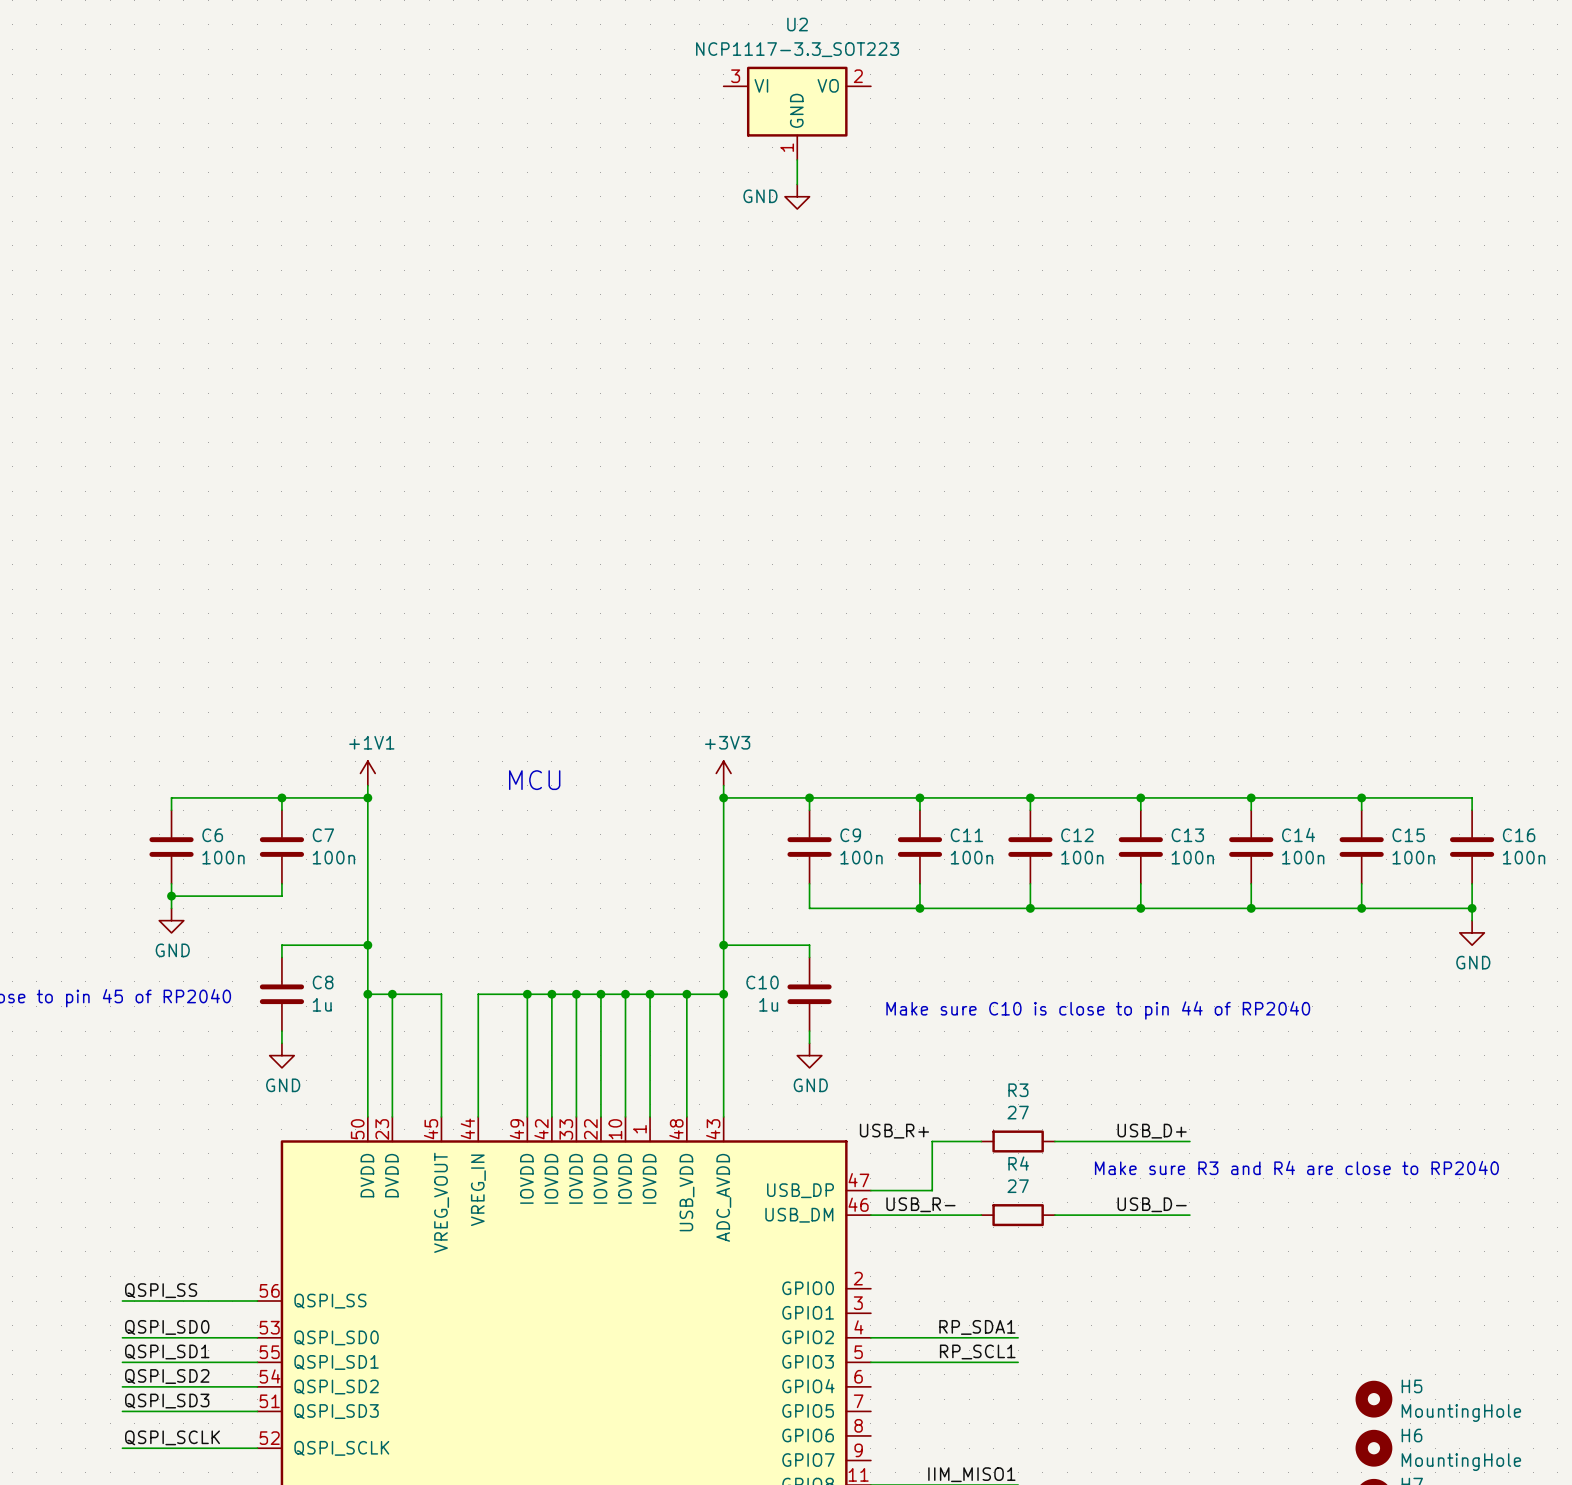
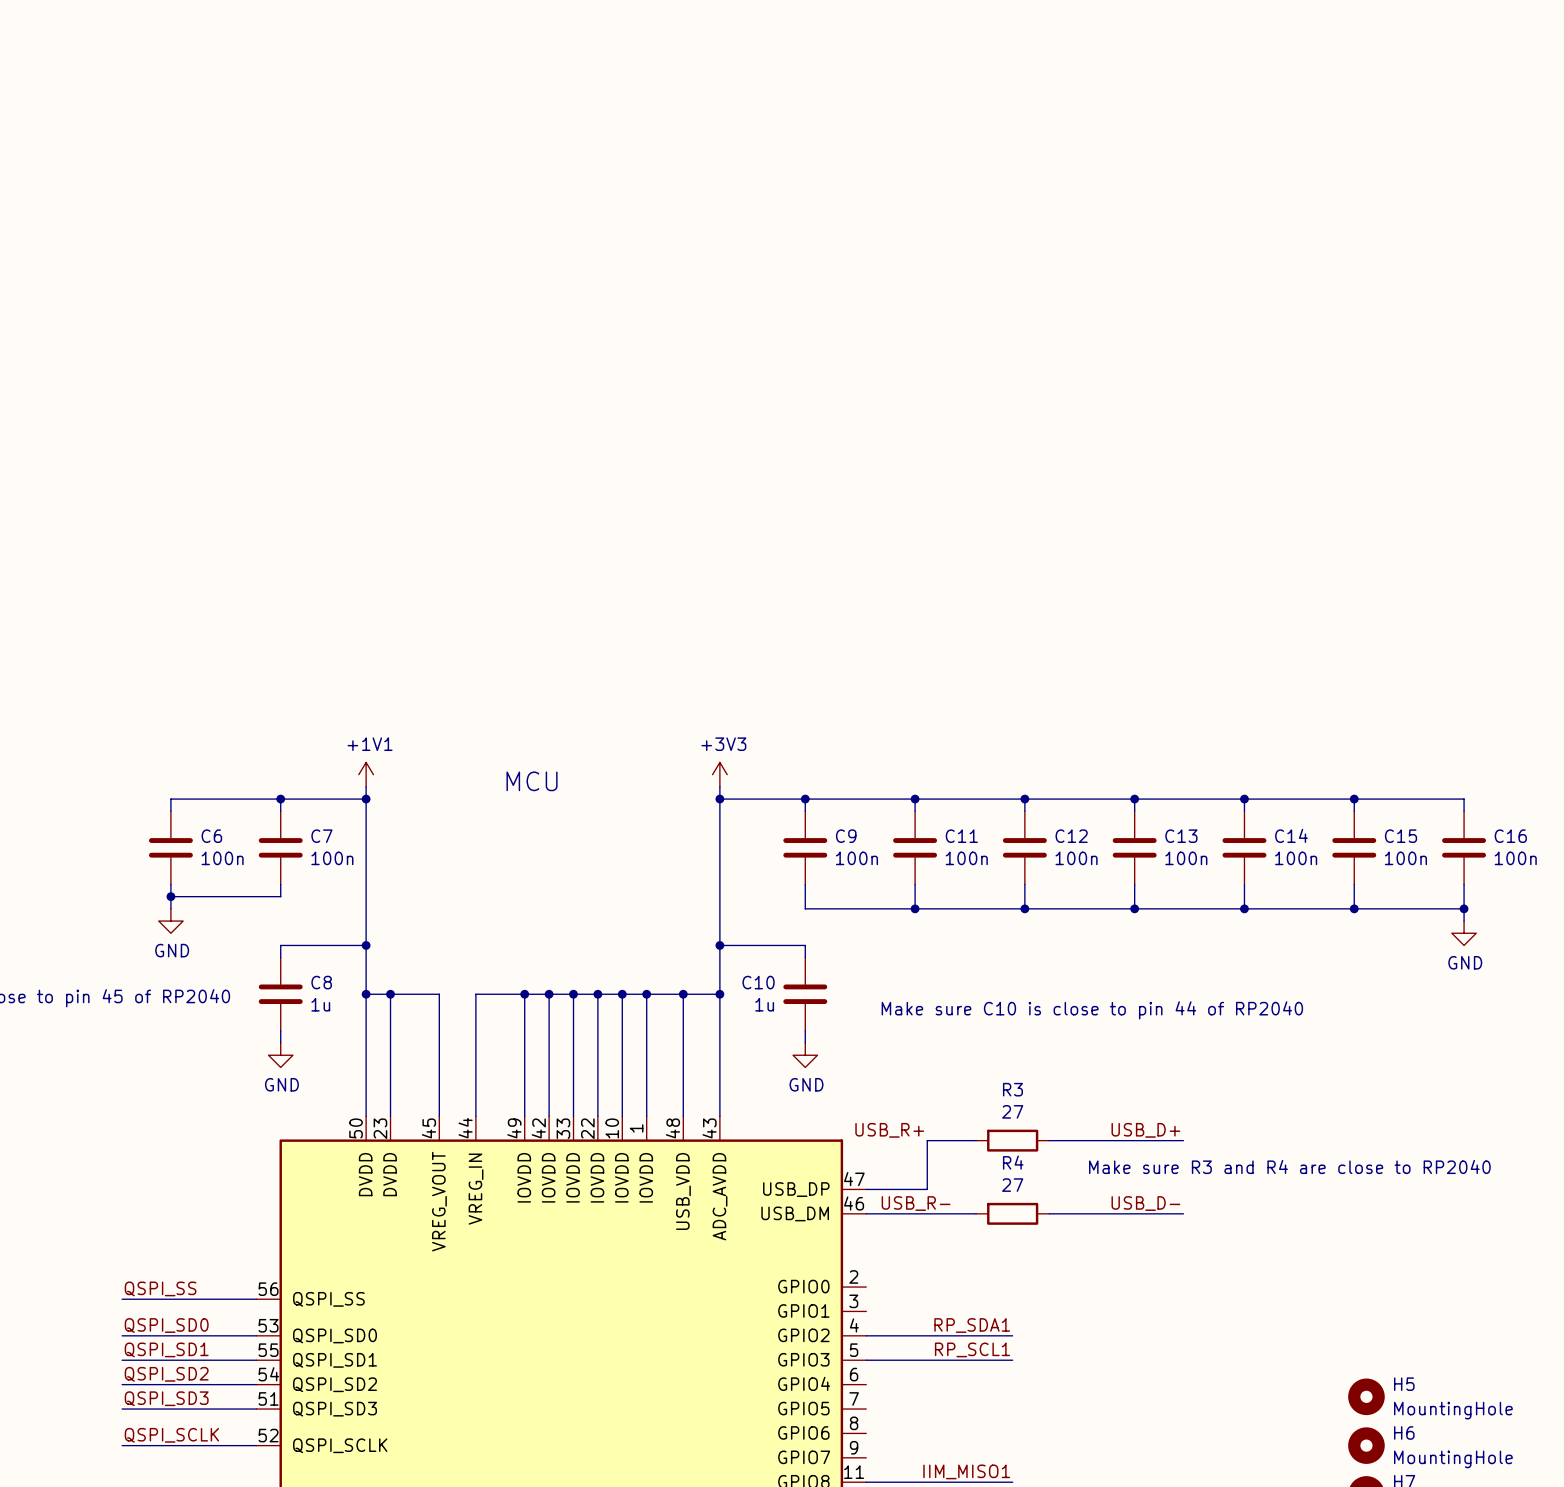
U2: NCP1117-3.3_SOT223 (797, 113) -> none
wire: (797, 159) (797, 184) -> none
power symbol: GND (797, 196) -> none

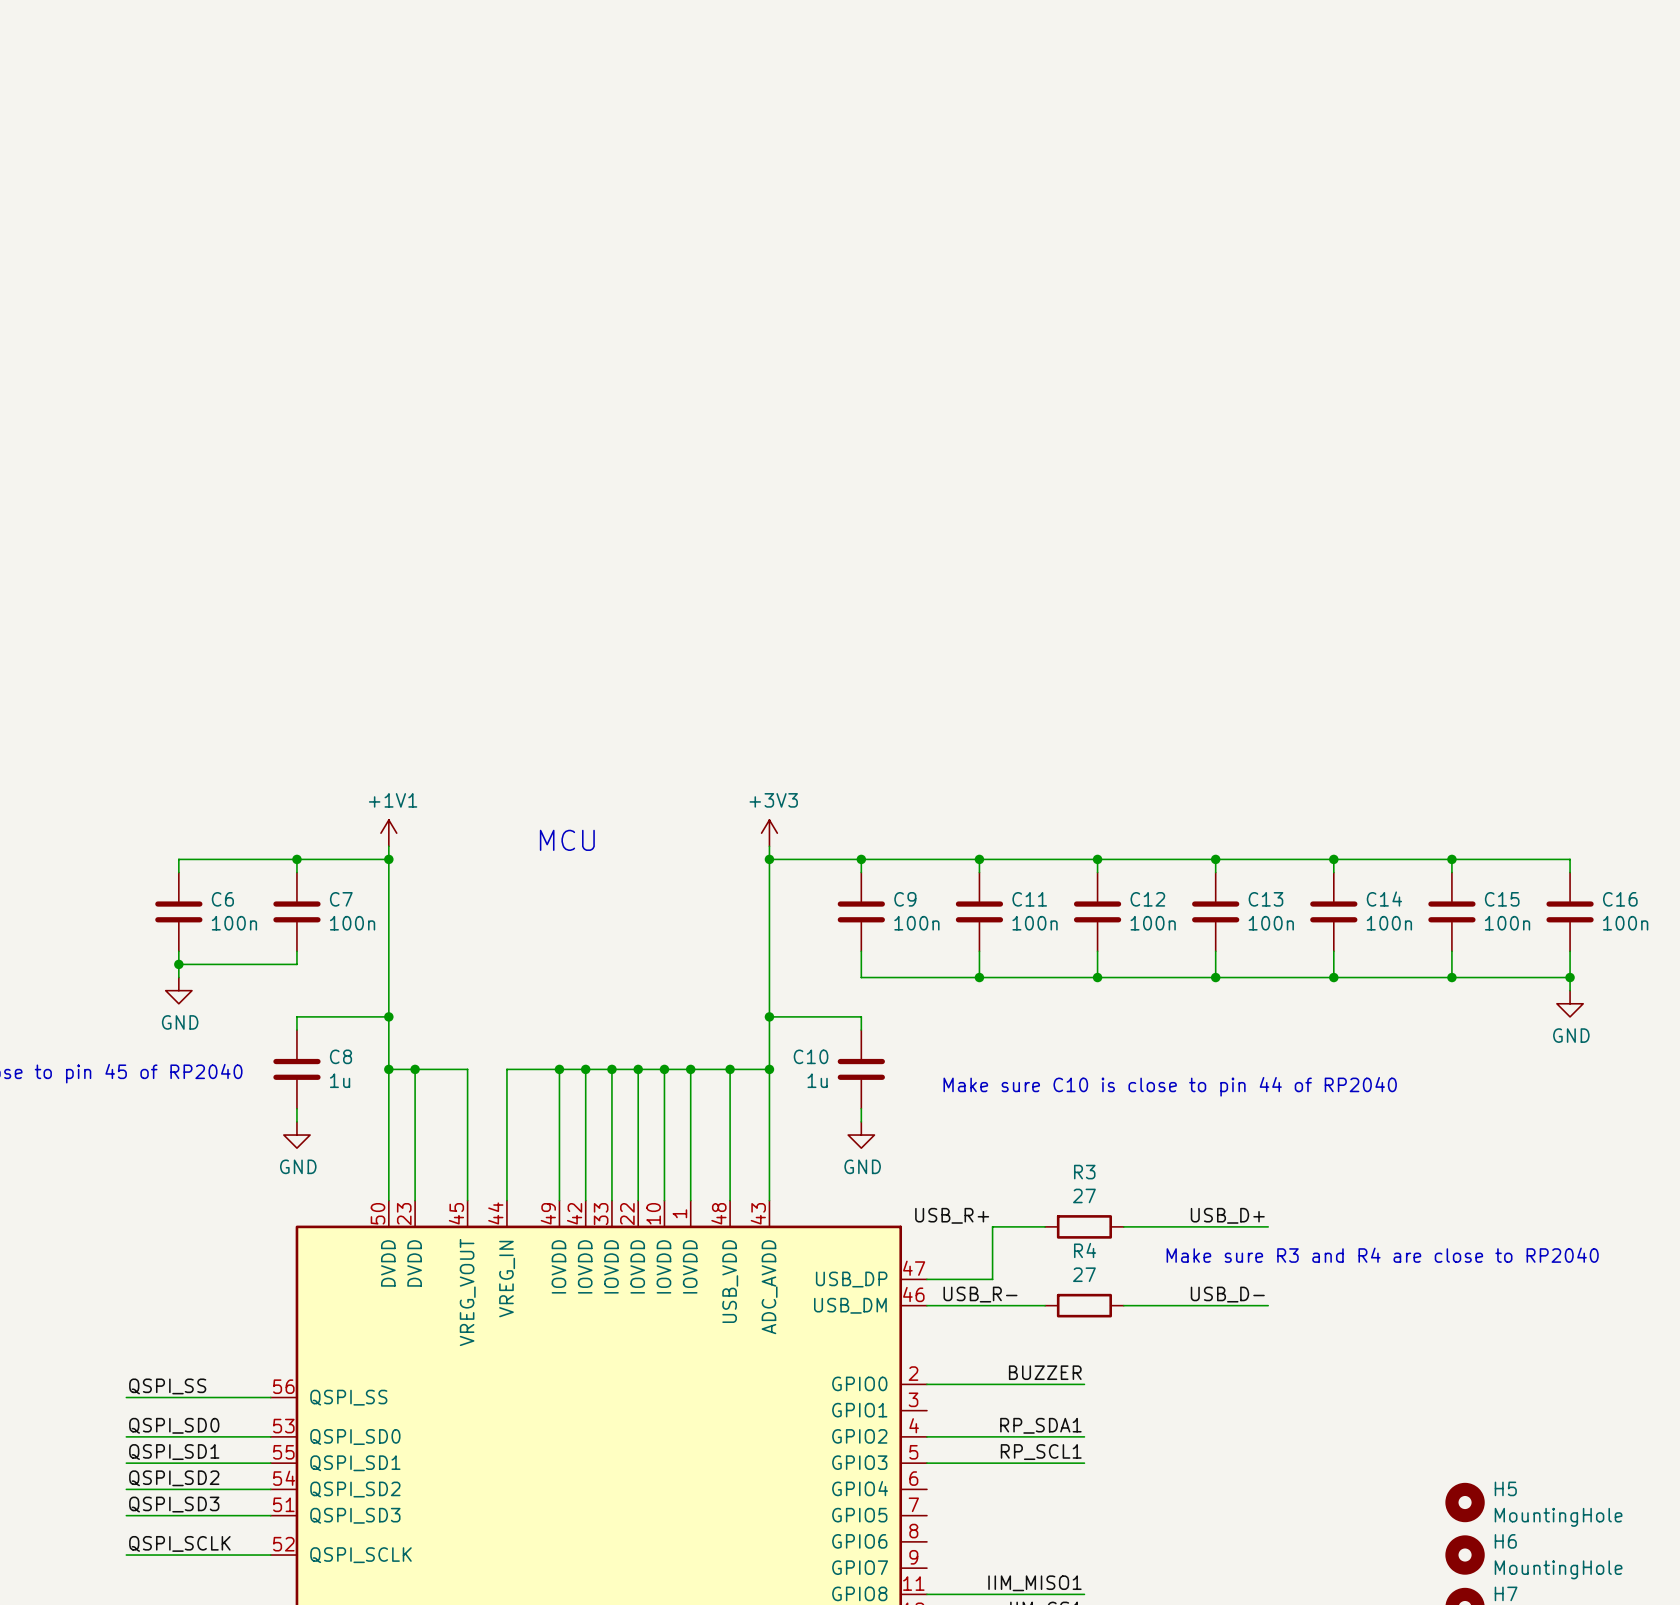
label: none -> BUZZER (1045, 1372)
wire: none -> (926, 1384) (1084, 1384)

